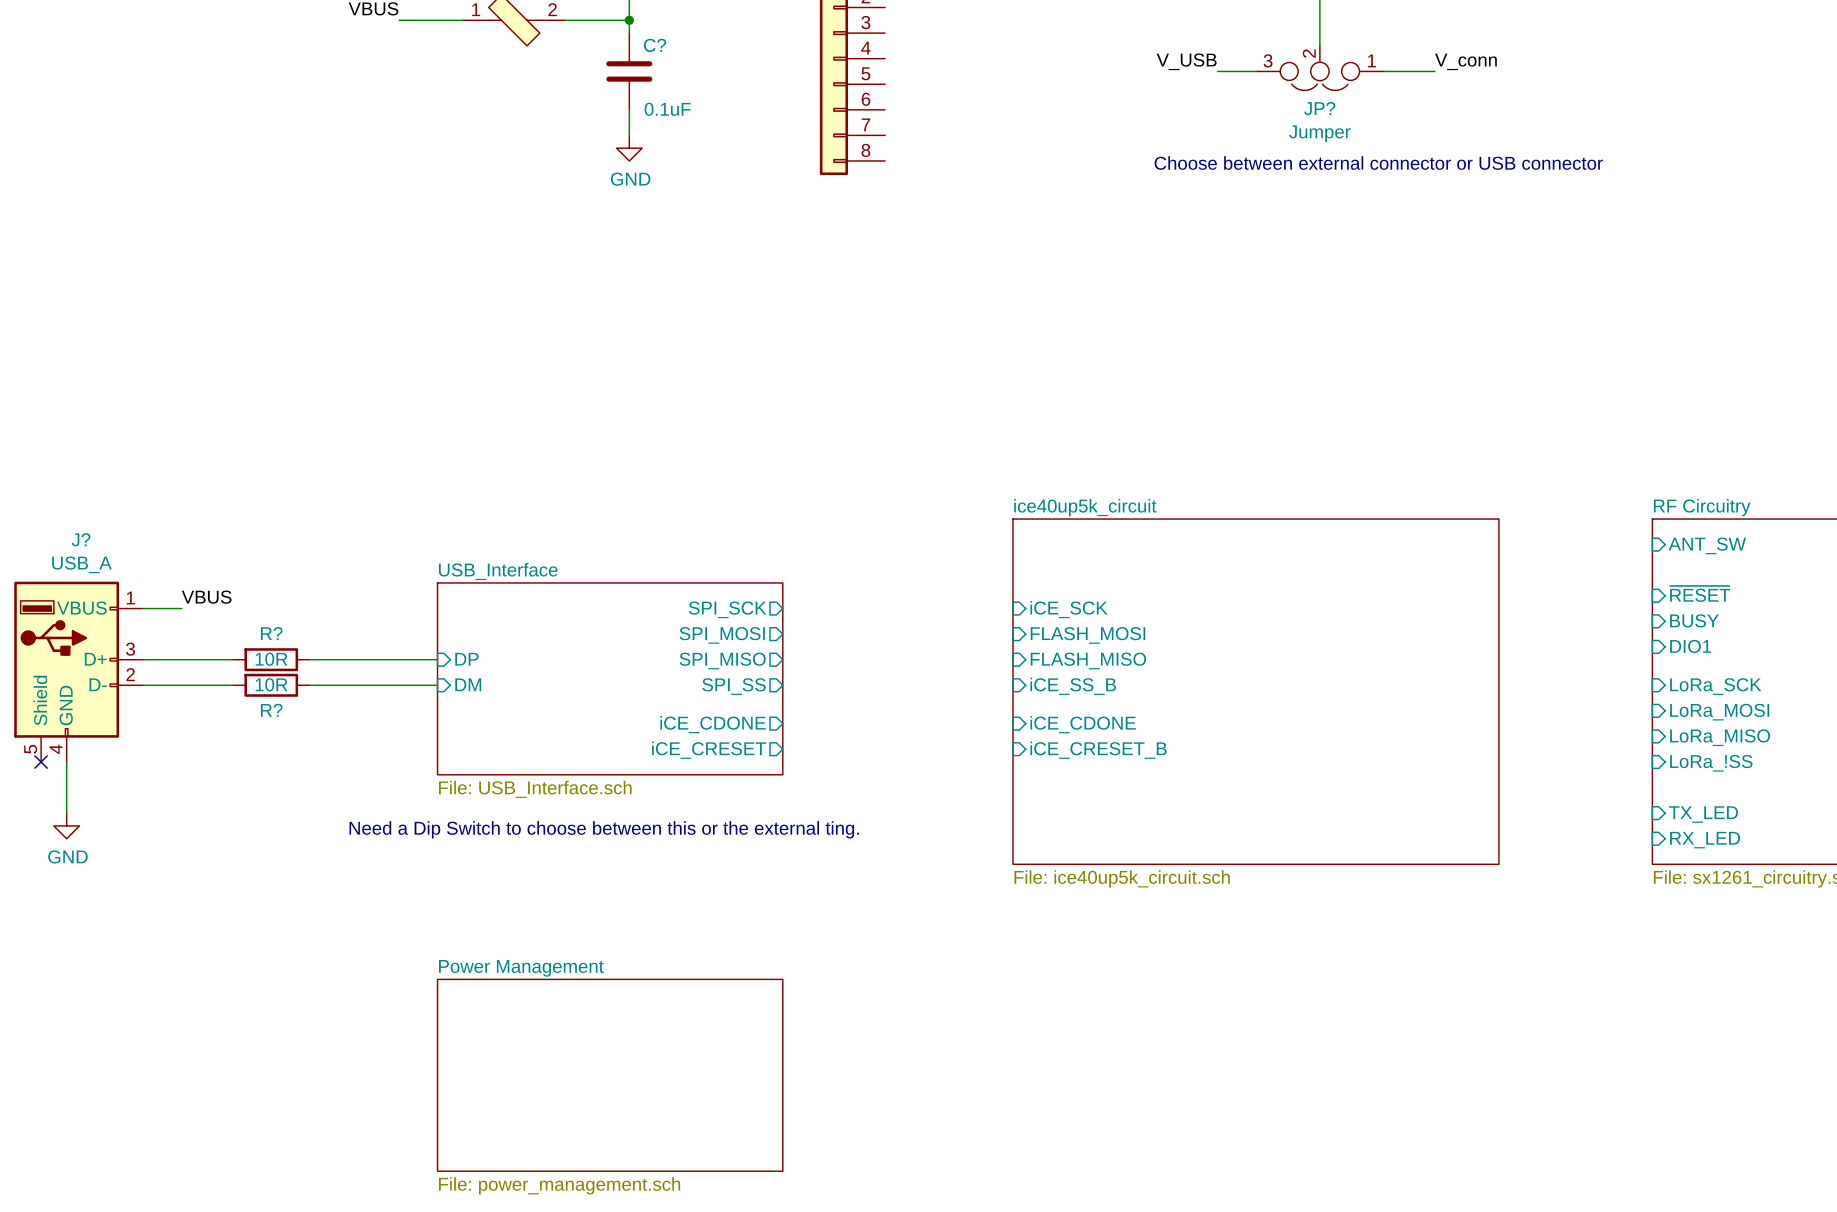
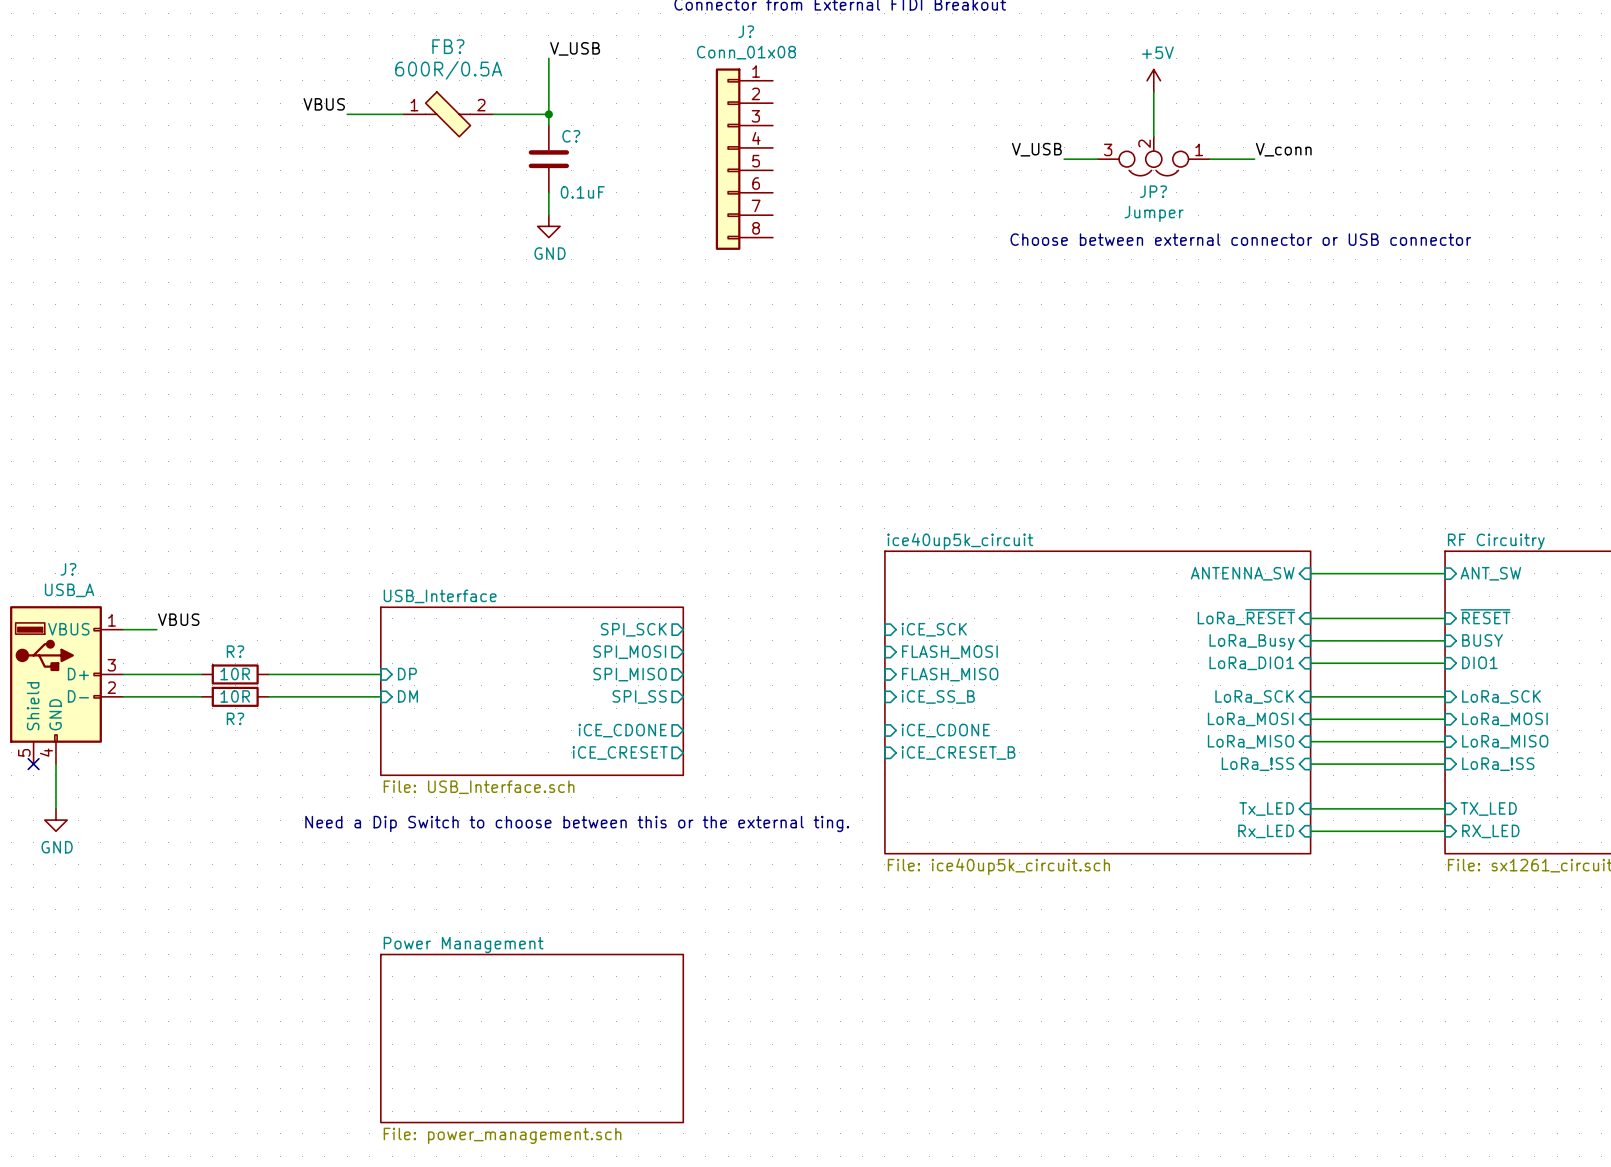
wire: none -> (1310, 573) (1445, 573)
sheet pin: none -> ANTENNA_SW (1242, 573)
sheet pin: none -> LoRa_~{RESET} (1246, 617)
wire: none -> (1310, 618) (1445, 618)
wire: none -> (1310, 640) (1445, 640)
sheet pin: none -> LoRa_Busy (1252, 642)
wire: none -> (1310, 663) (1445, 663)
sheet pin: none -> LoRa_DIO1 (1251, 663)
wire: none -> (1310, 696) (1445, 696)
sheet pin: none -> LoRa_SCK (1254, 696)
wire: none -> (1310, 719) (1445, 719)
sheet pin: none -> LoRa_MOSI (1250, 719)
wire: none -> (1310, 741) (1445, 741)
sheet pin: none -> LoRa_MISO (1250, 741)
wire: none -> (1310, 764) (1445, 764)
sheet pin: none -> LoRa_!SS (1257, 764)
wire: none -> (1310, 808) (1445, 808)
sheet pin: none -> Tx_LED (1266, 809)
wire: none -> (1310, 831) (1445, 831)
sheet pin: none -> Rx_LED (1266, 831)

